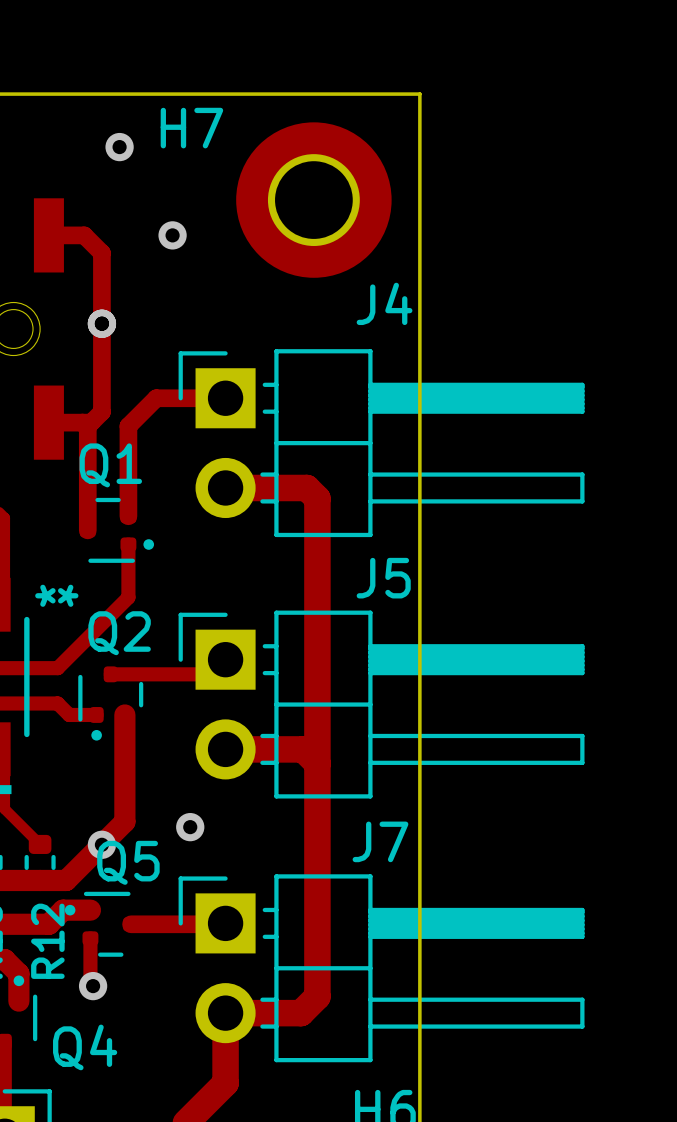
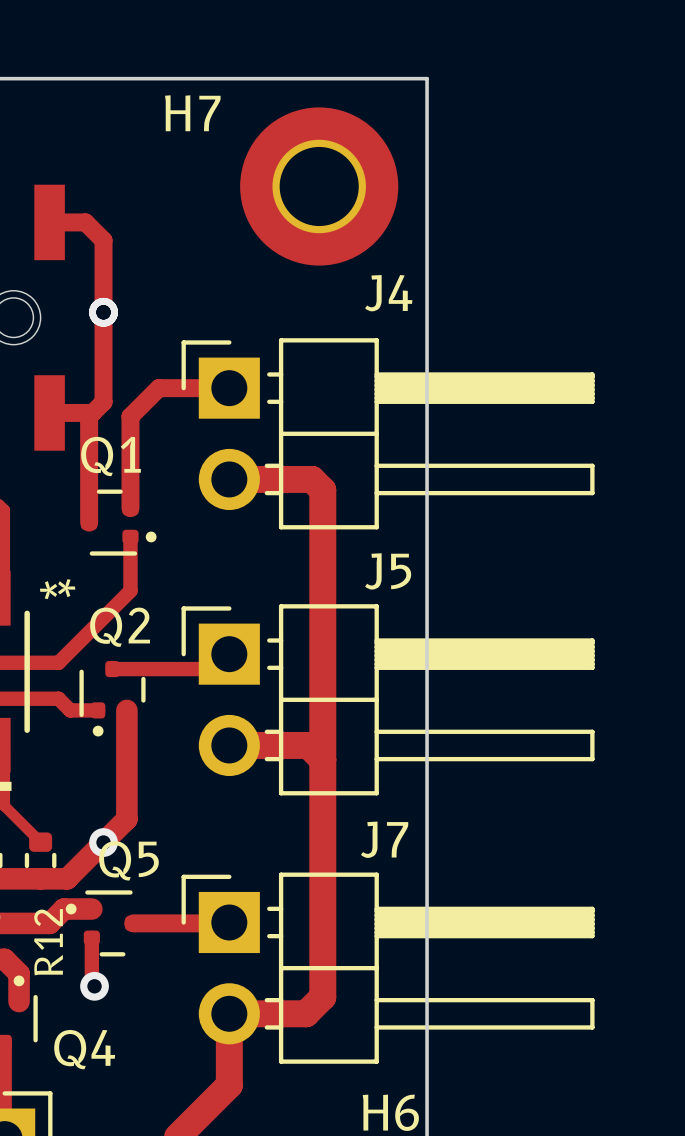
via: (119, 147) -> none
via: (172, 235) -> none
via: (190, 827) -> none

